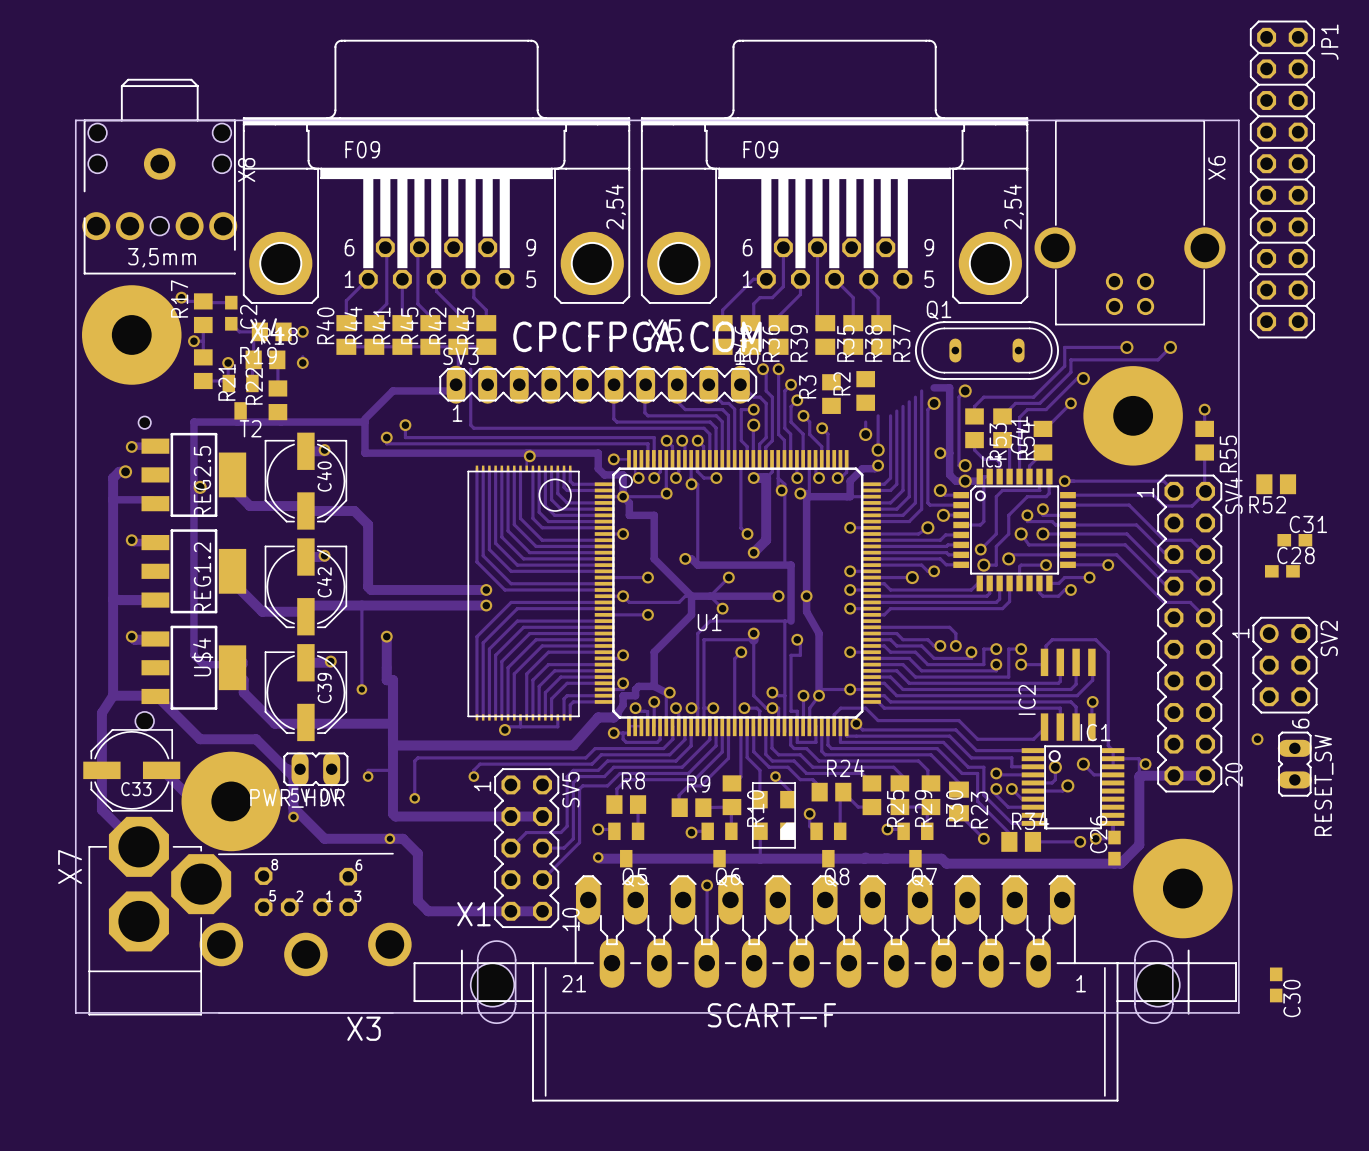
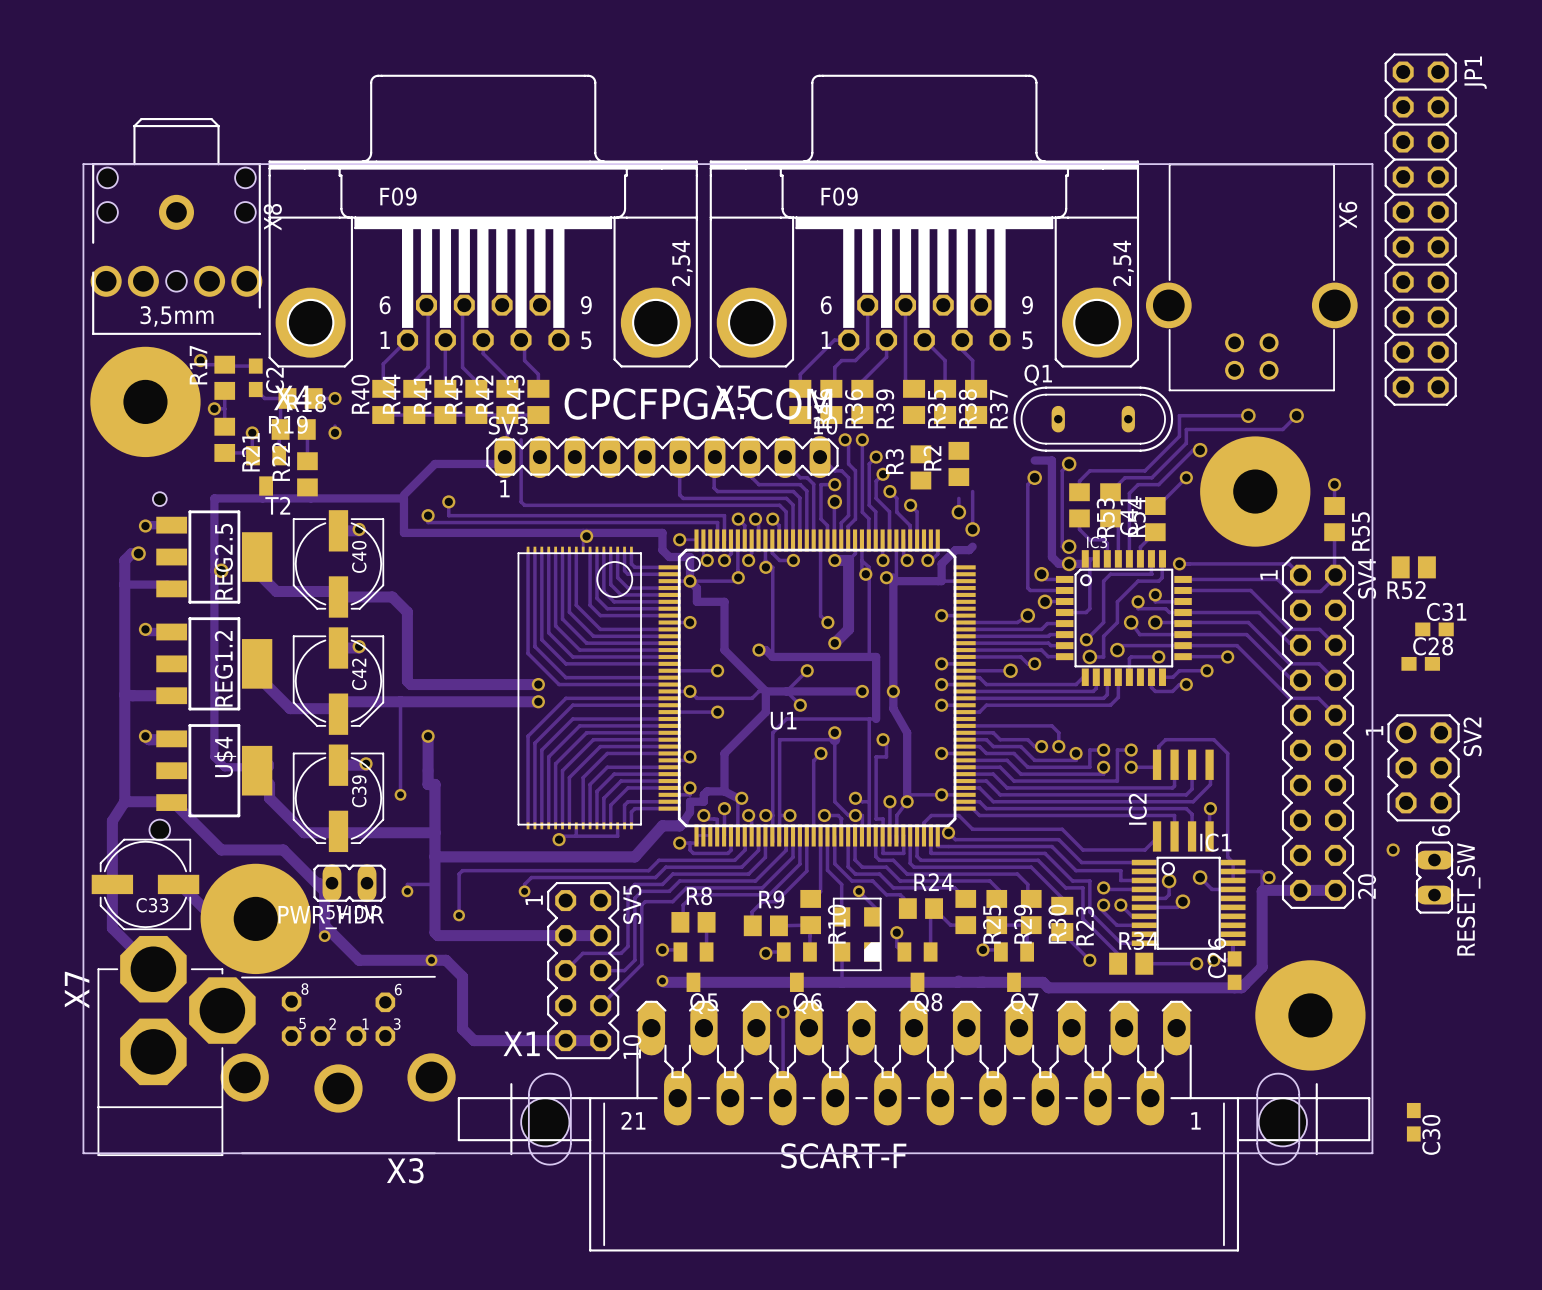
track: (921, 390) (921, 509) (909, 521) (870, 521) -> none
track: (915, 397) (915, 502) (903, 515) (870, 515) -> none
track: (909, 401) (909, 496) (896, 509) (870, 509) -> none
track: (903, 406) (903, 490) (890, 502) (870, 502) -> none
track: (896, 411) (896, 484) (890, 490) (870, 490) -> none
track: (890, 415) (890, 478) (884, 484) (870, 484) -> none
via: (940, 453) -> none
via: (878, 465) -> none

